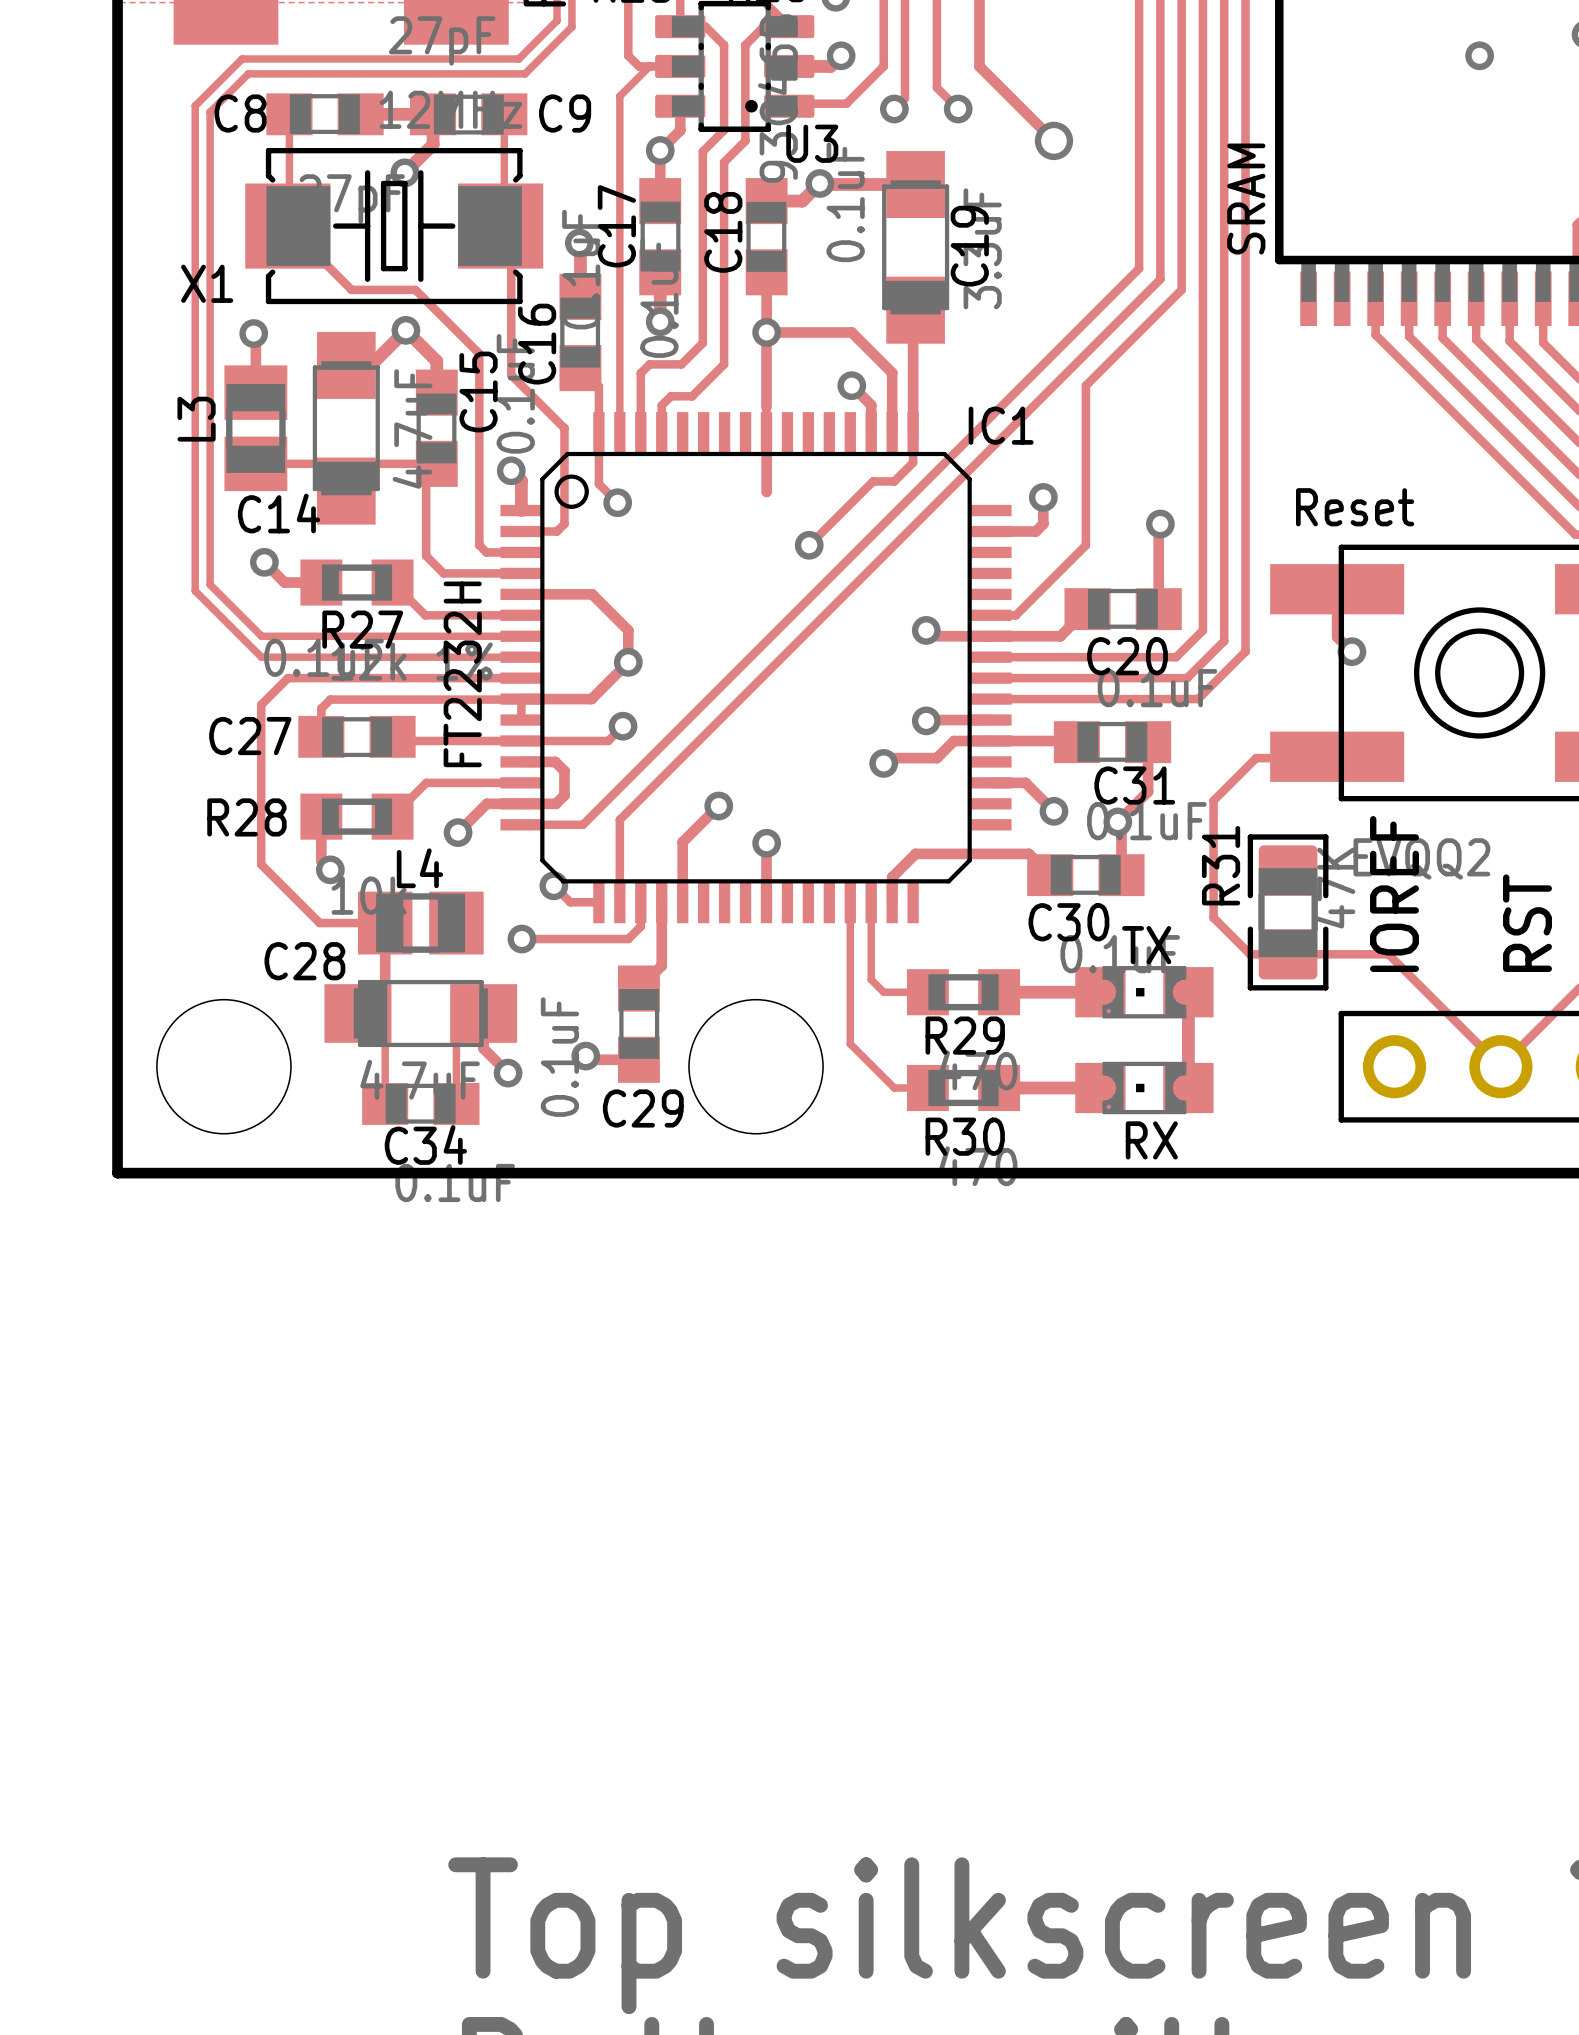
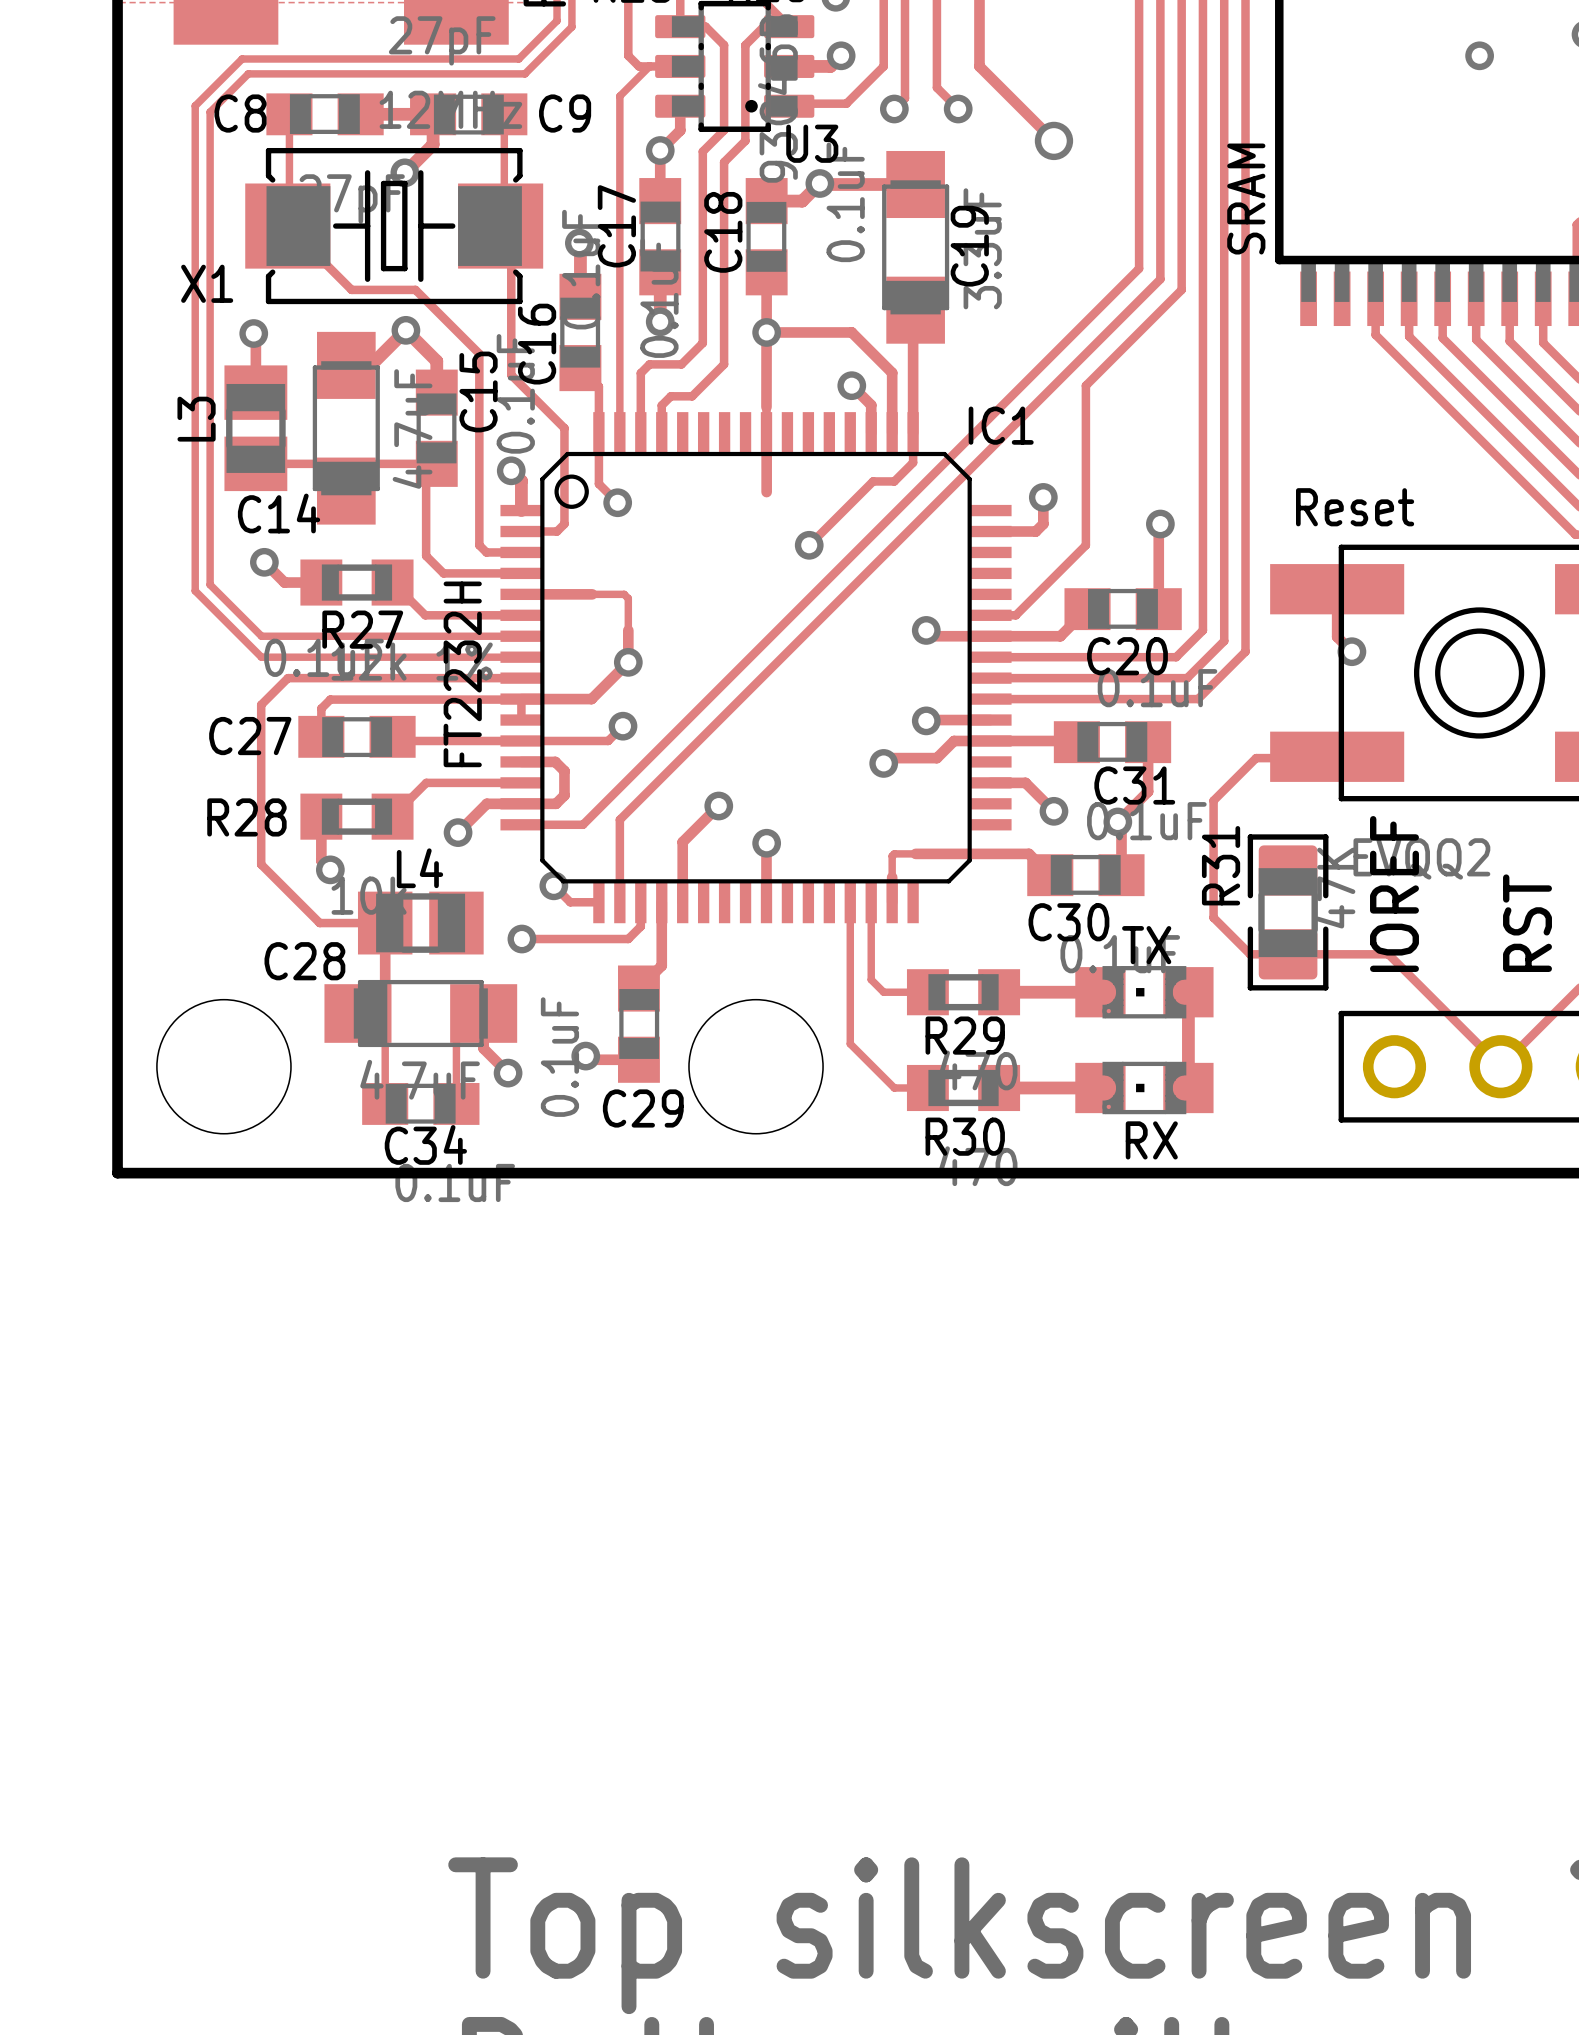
track: (592, 594) (628, 630) -> (592, 594) (624, 594) (628, 598) (628, 630)
track: (915, 853) (892, 877) -> (915, 853) (894, 853) (892, 856) (892, 877)

